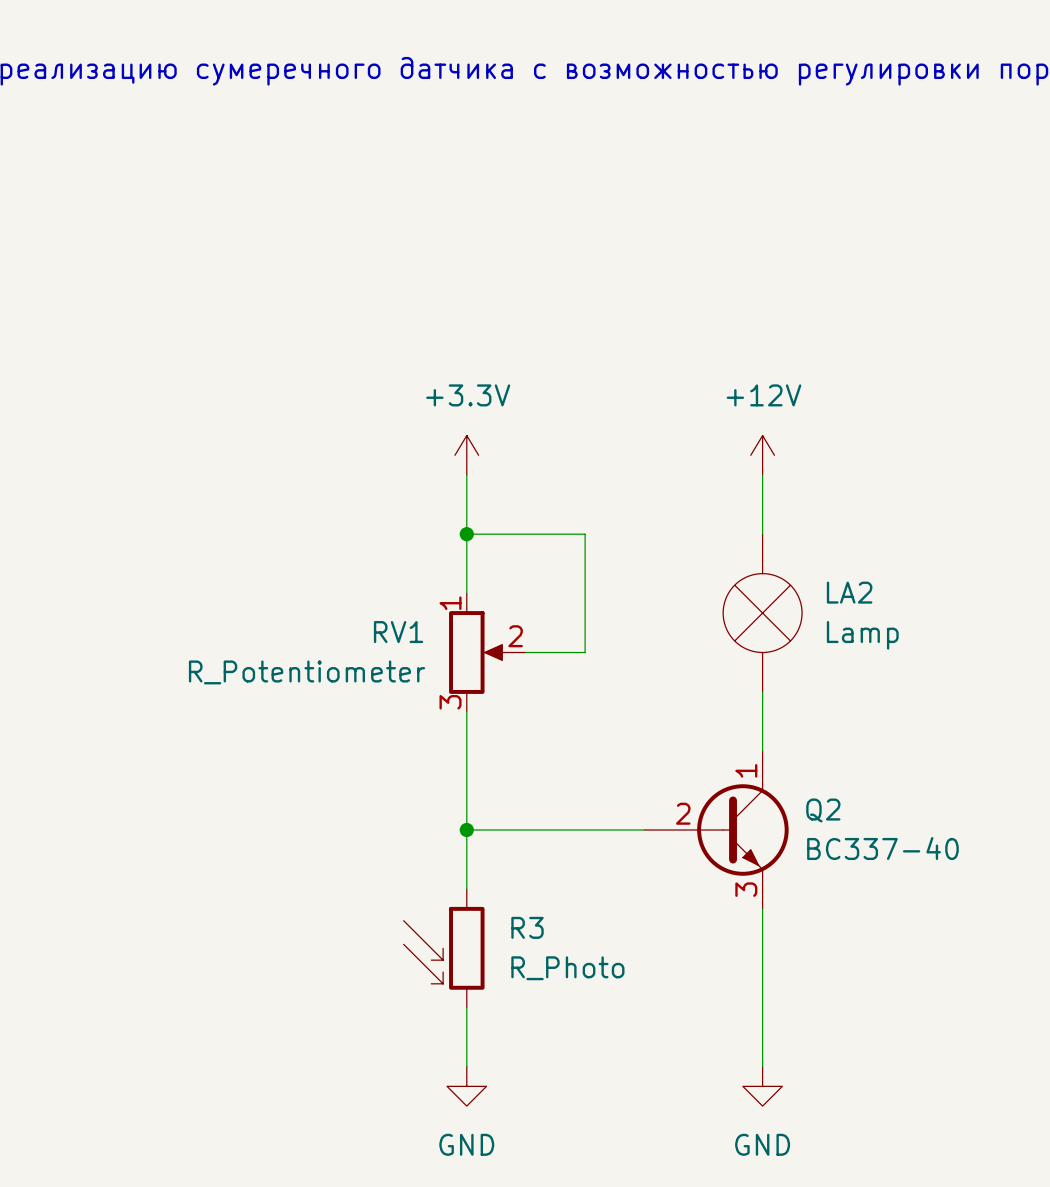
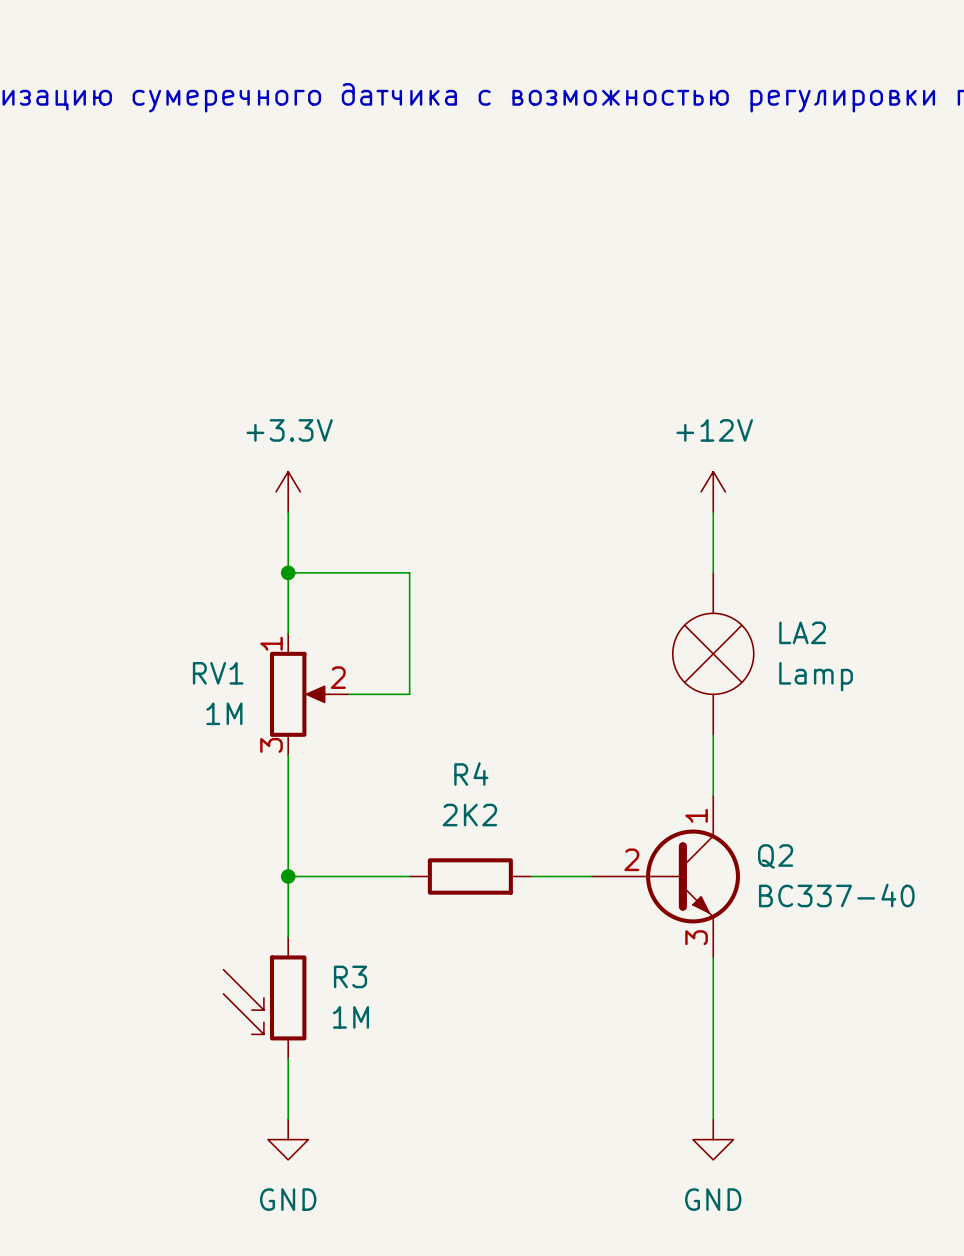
power symbol position: +3.3V (466, 455) -> +3.3V (288, 491)
wire: none -> (288, 512) (288, 633)
wire: (466, 475) (466, 534) (585, 534) (585, 652) (525, 652) -> none
wire: none -> (288, 572) (409, 572)
junction: none -> (288, 572)
junction: (466, 534) -> none
wire: none -> (409, 633) (409, 694) (348, 694)
RV1 position: (487, 652) -> (309, 694)
RV1 value: R_Potentiometer (306, 672) -> 1M (224, 713)
wire: (466, 711) (466, 889) -> (288, 755) (288, 937)
junction: none -> (288, 876)
wire: (466, 830) (585, 830) -> (409, 876) (288, 876)
junction: (466, 830) -> none
R4: none -> 2K2 (470, 876)
R3 position: (444, 948) -> (264, 997)
R3 value: R_Photo (567, 968) -> 1M (351, 1017)
wire: (466, 1007) (466, 1066) -> (288, 1058) (288, 1119)
power symbol position: GND (466, 1086) -> GND (288, 1139)

